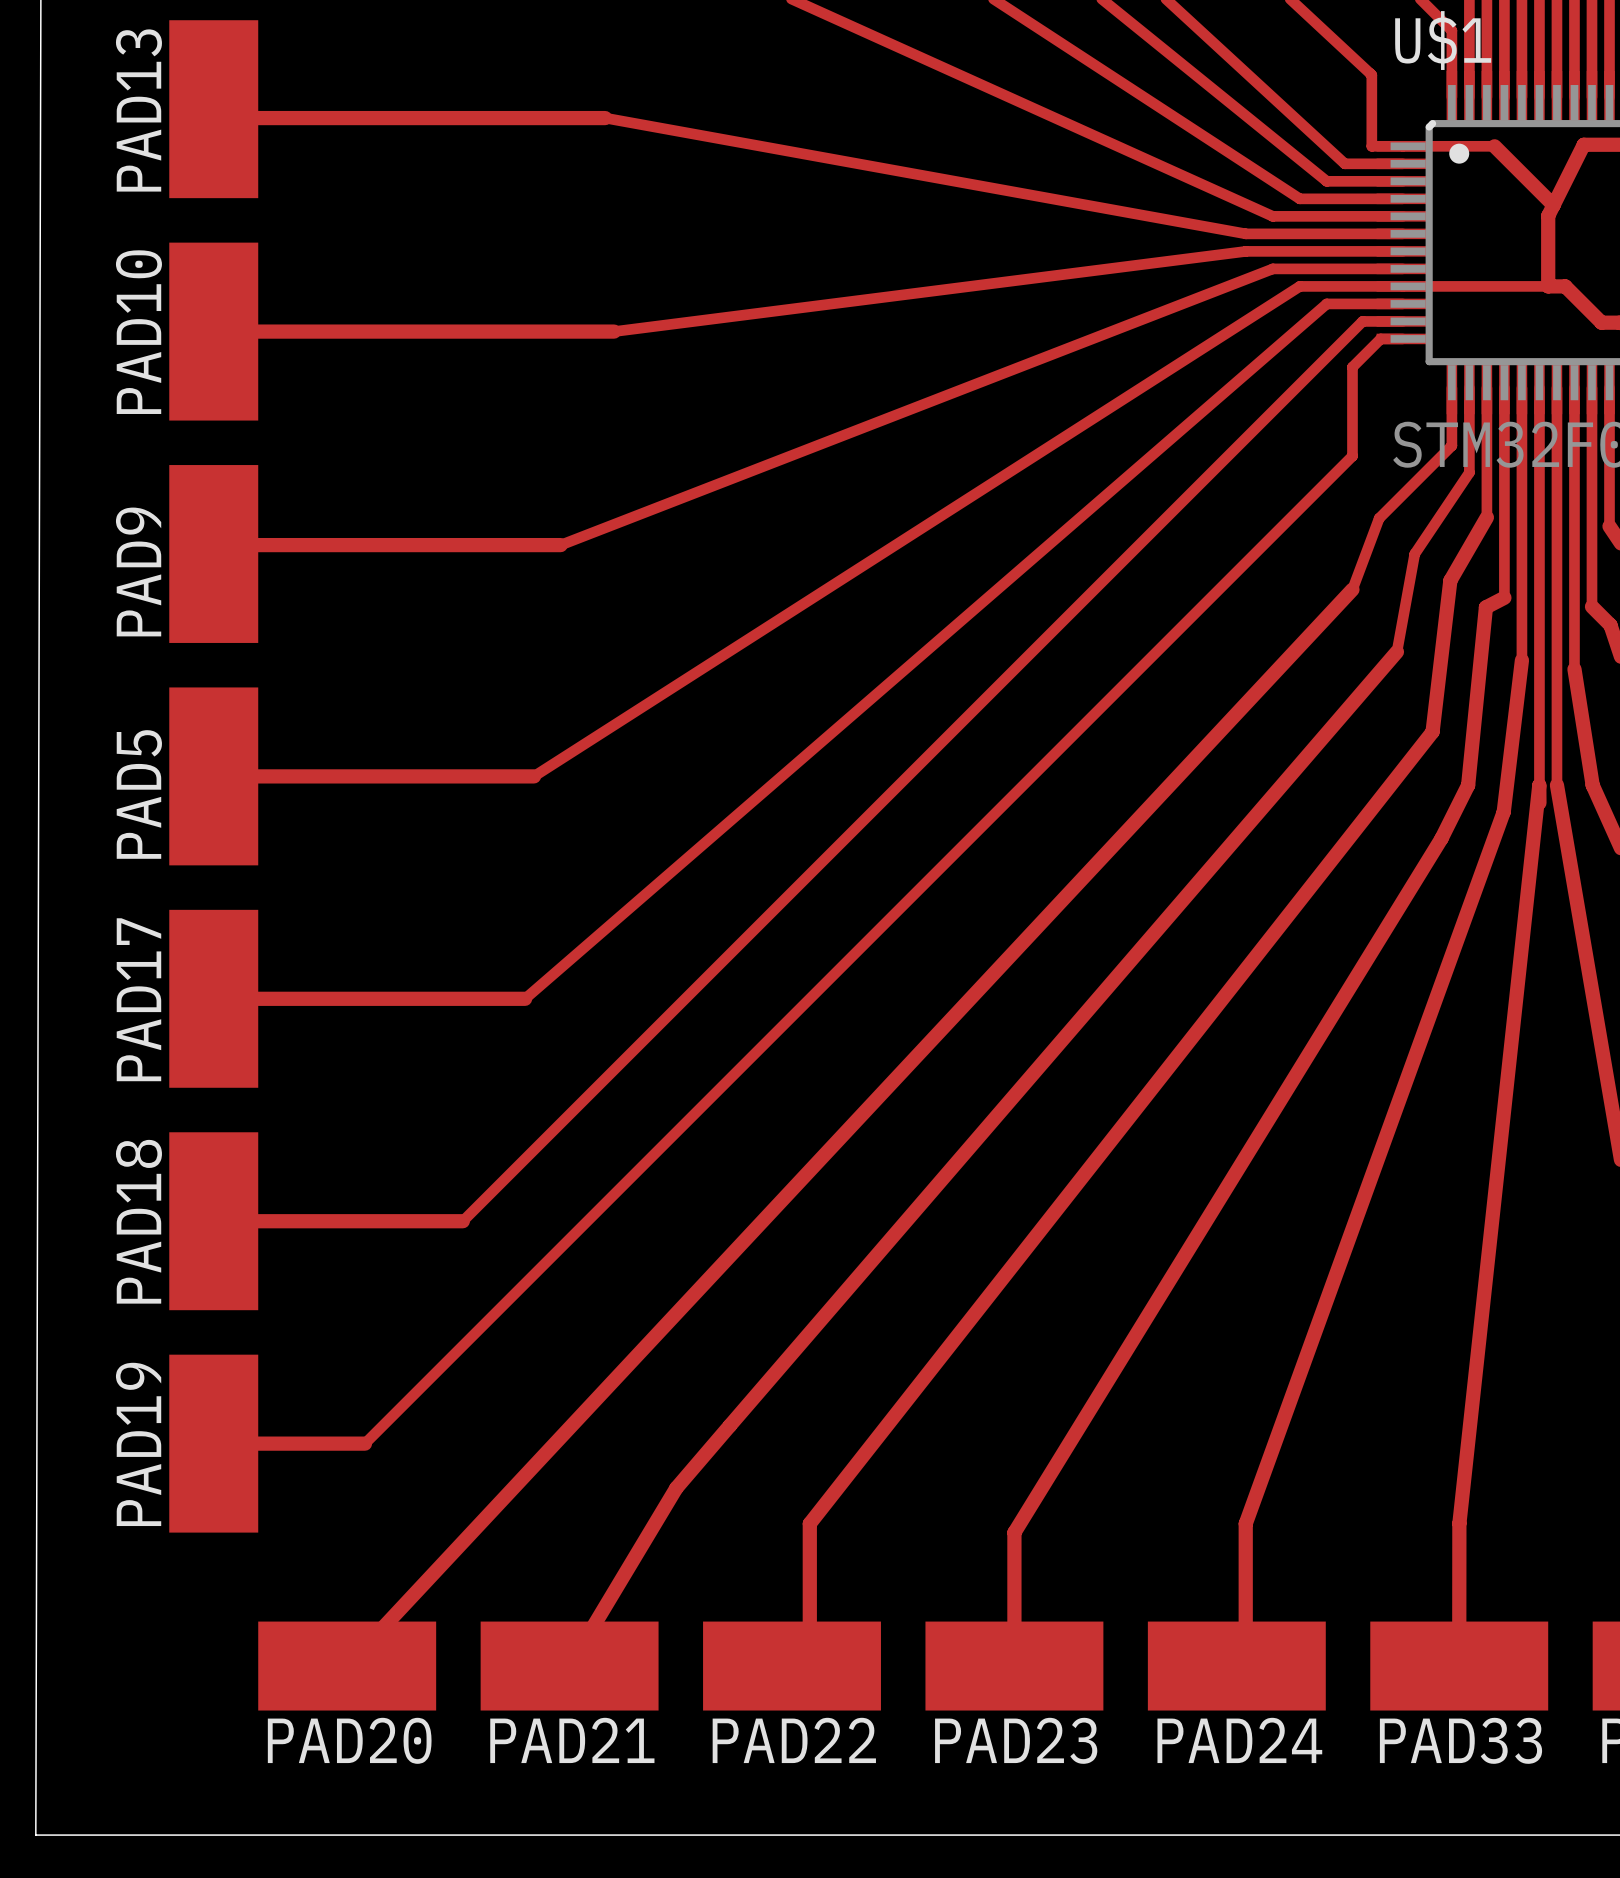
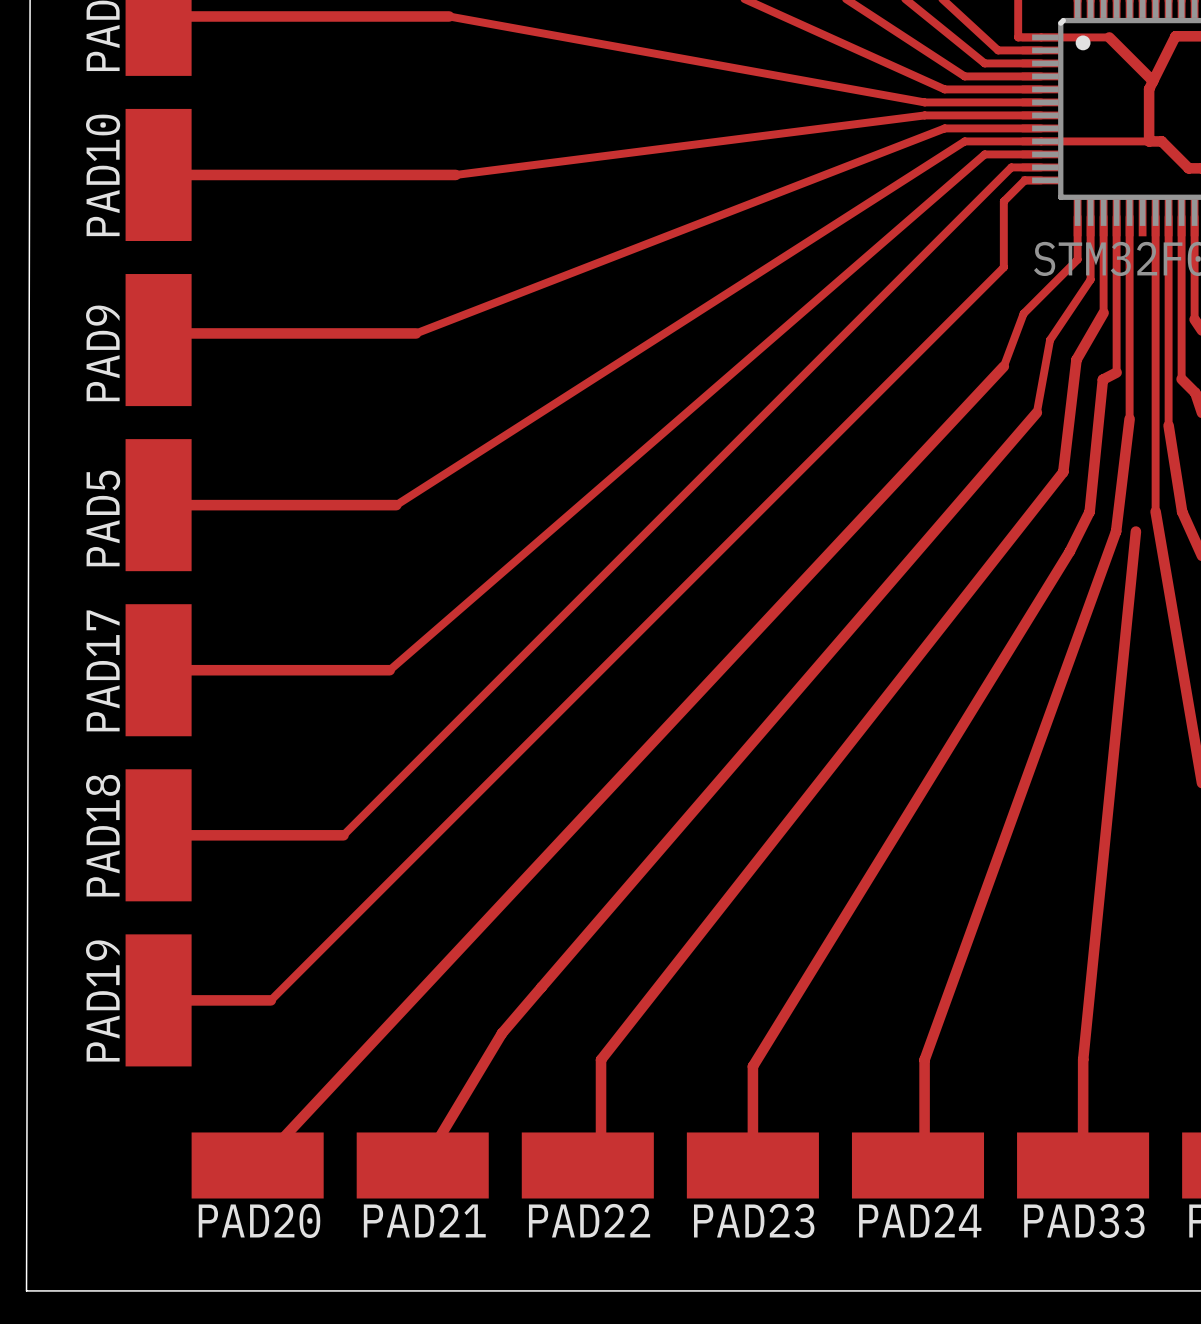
top track: (1539, 387) (1539, 802) (1539, 785) (1459, 1523) -> (1135, 531) (1083, 1059)

